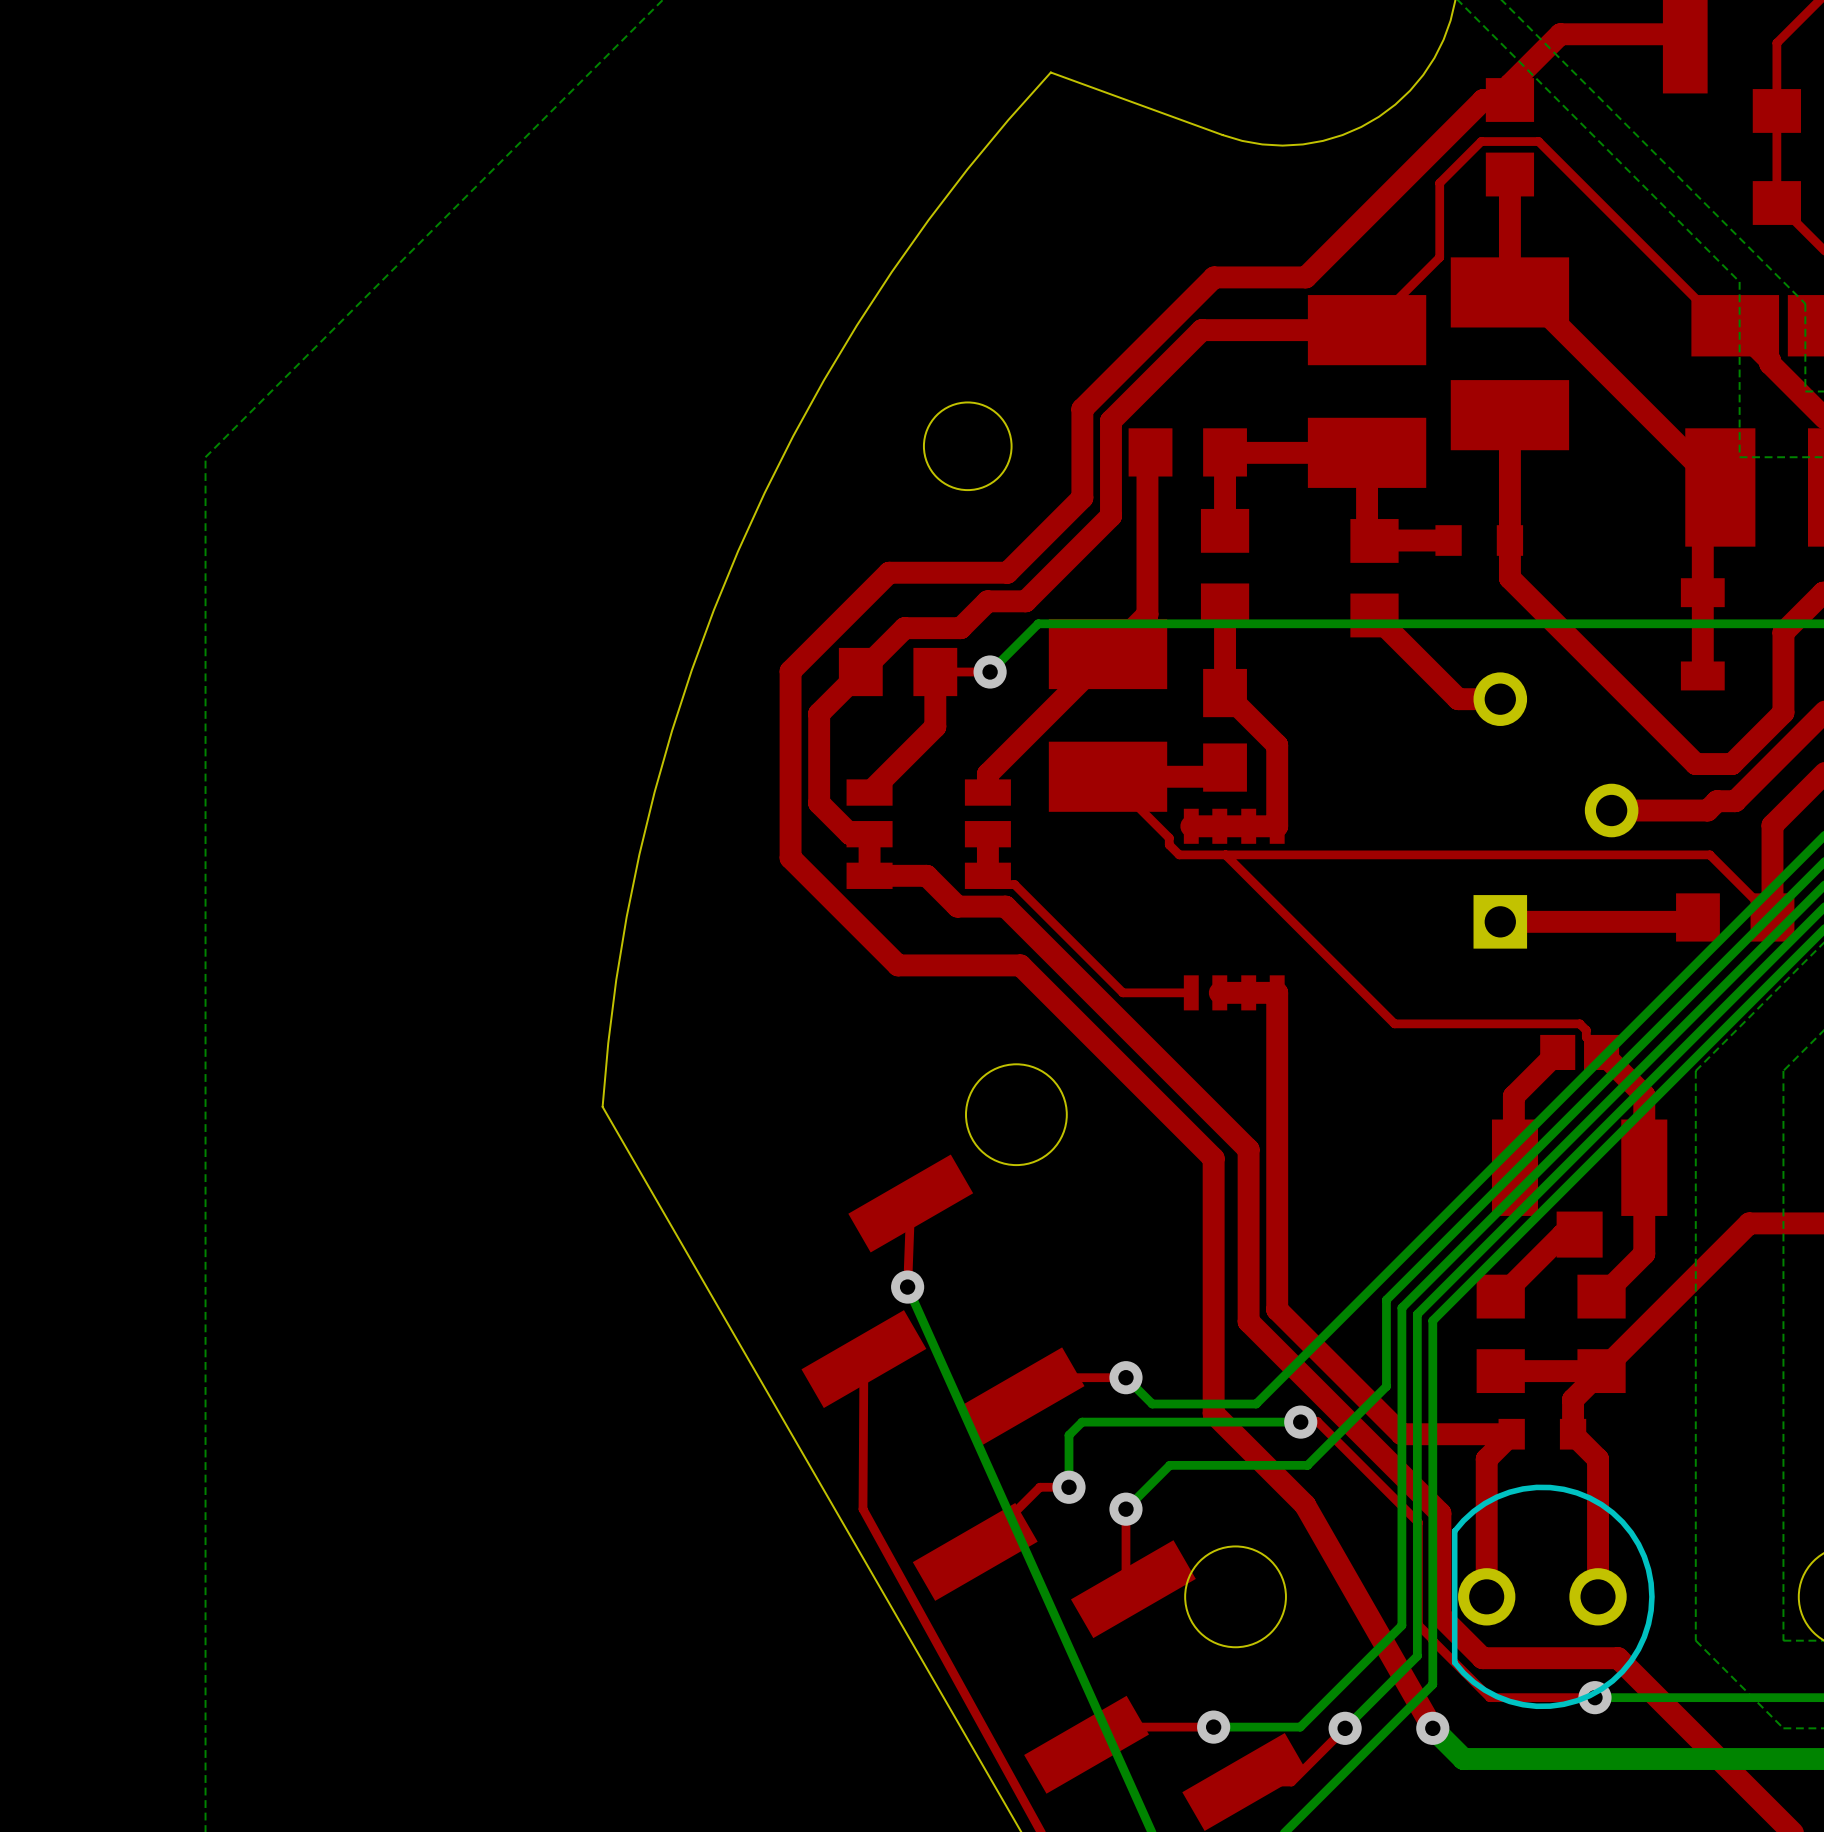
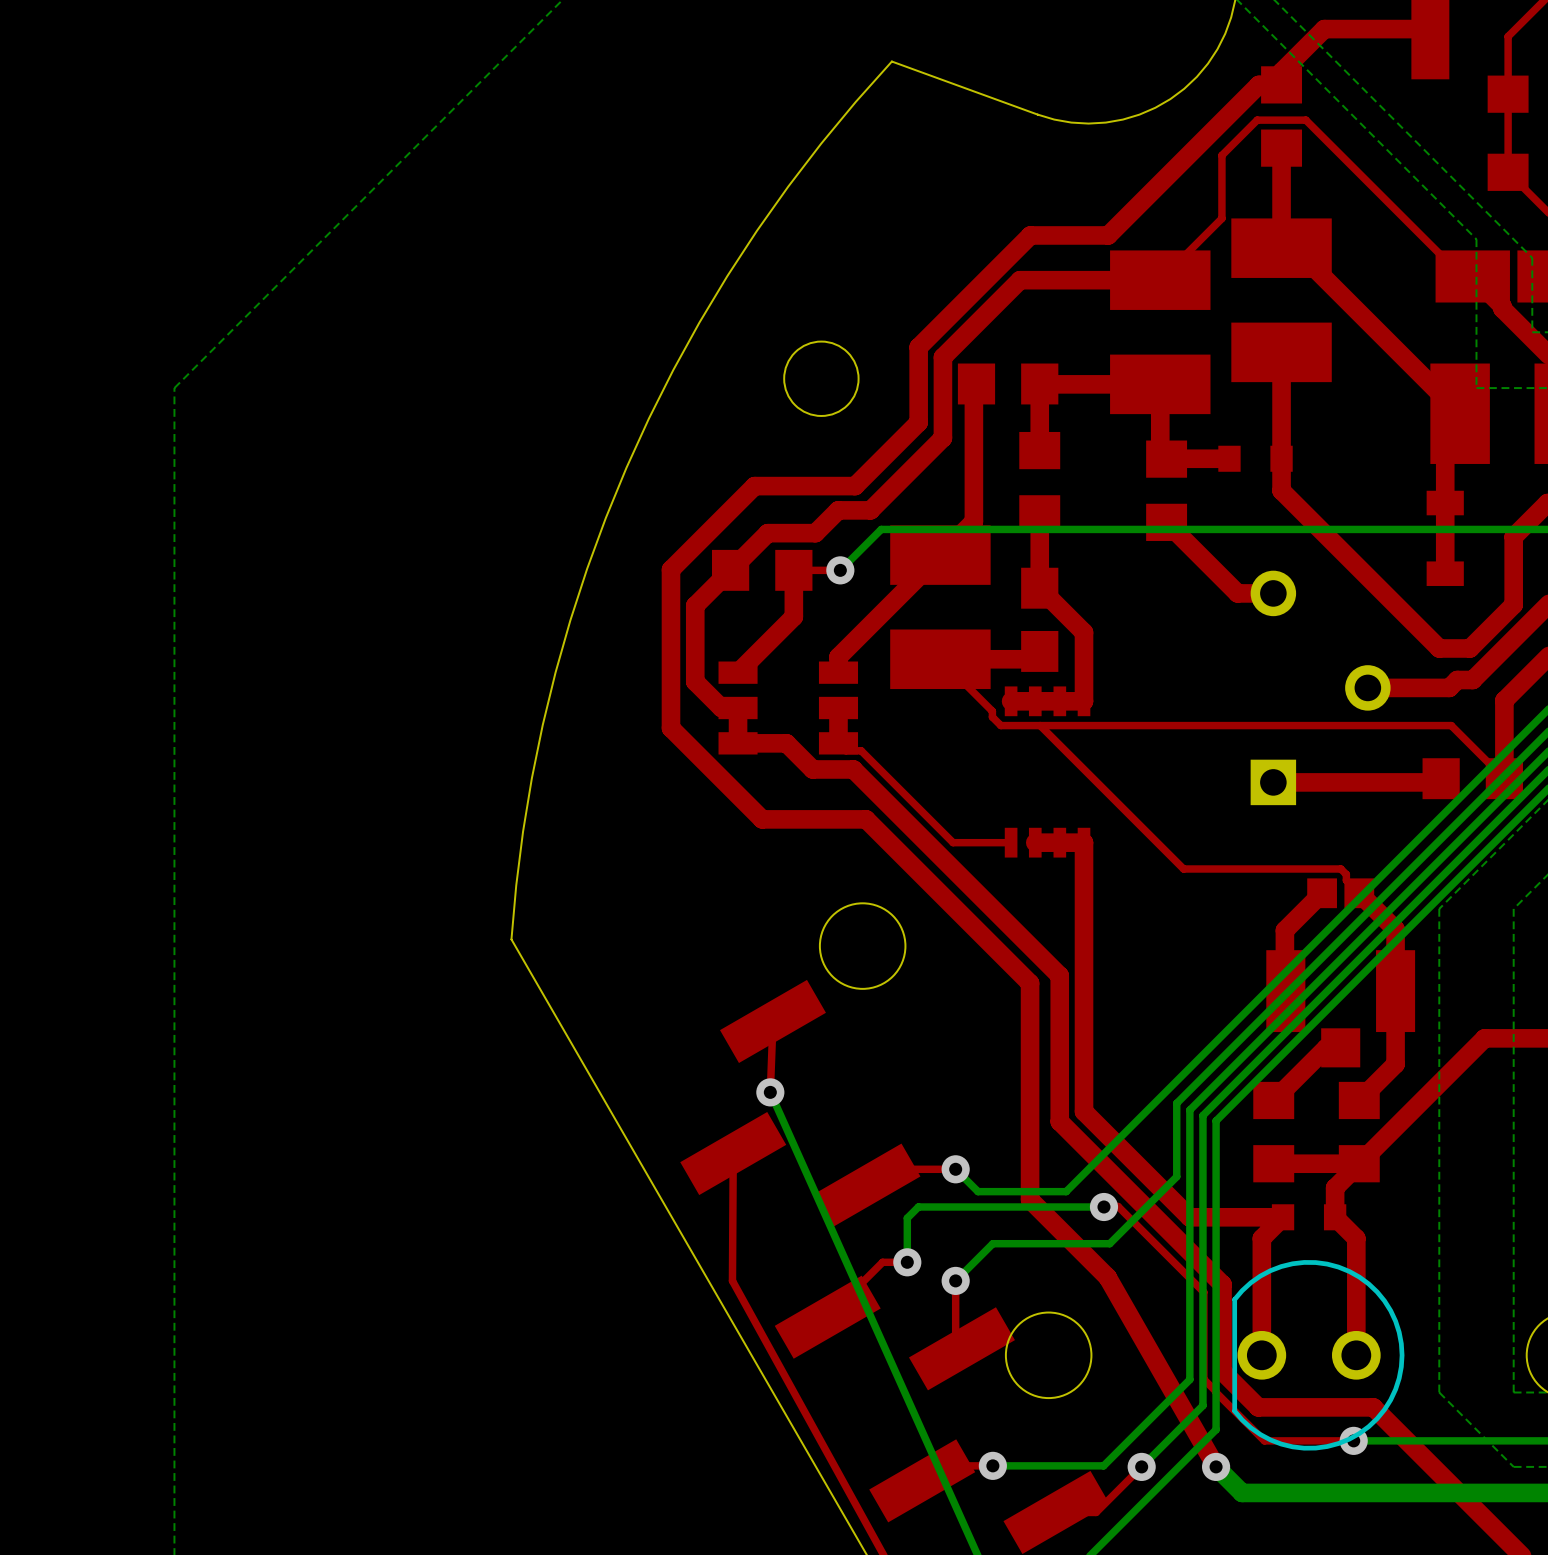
bottom track: none -> (1029, 1465) (991, 1465)
top track: (1213, 1727) (1169, 1727) -> none
via position: (1213, 1727) -> (992, 1465)

